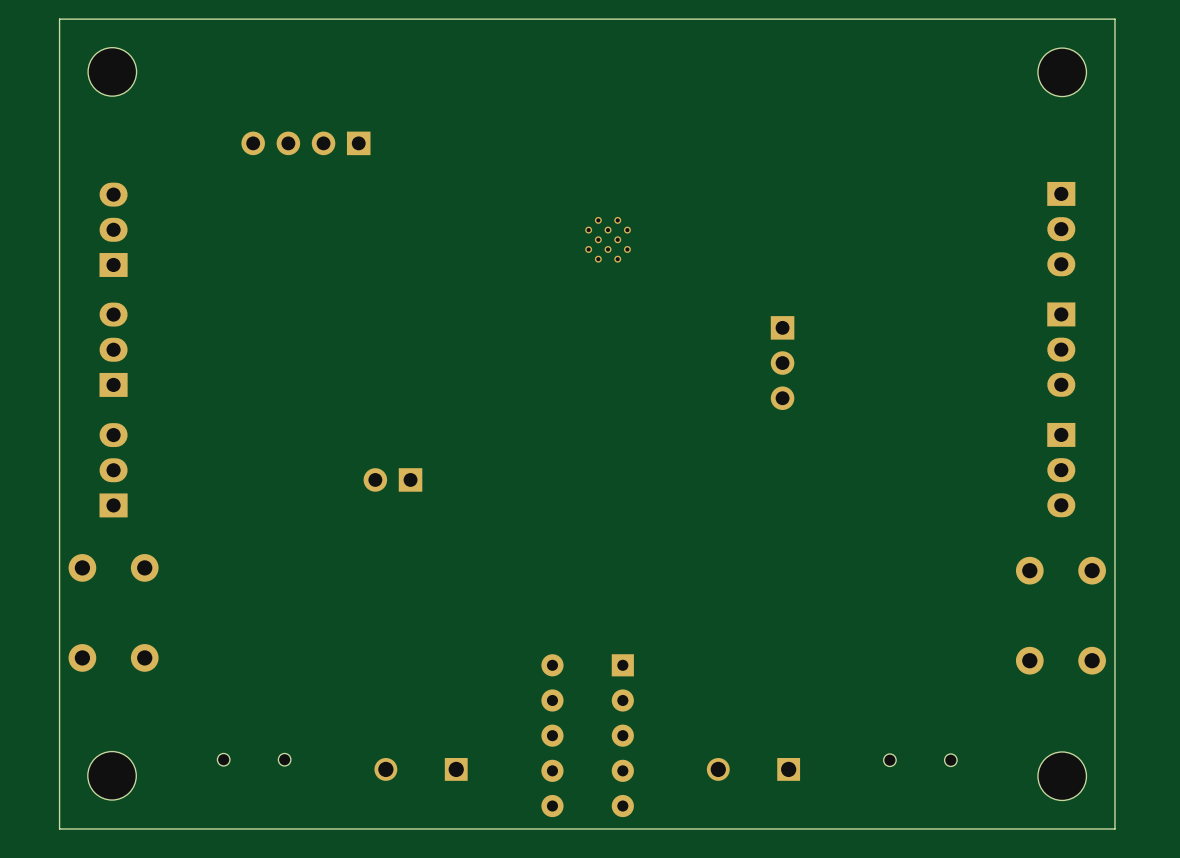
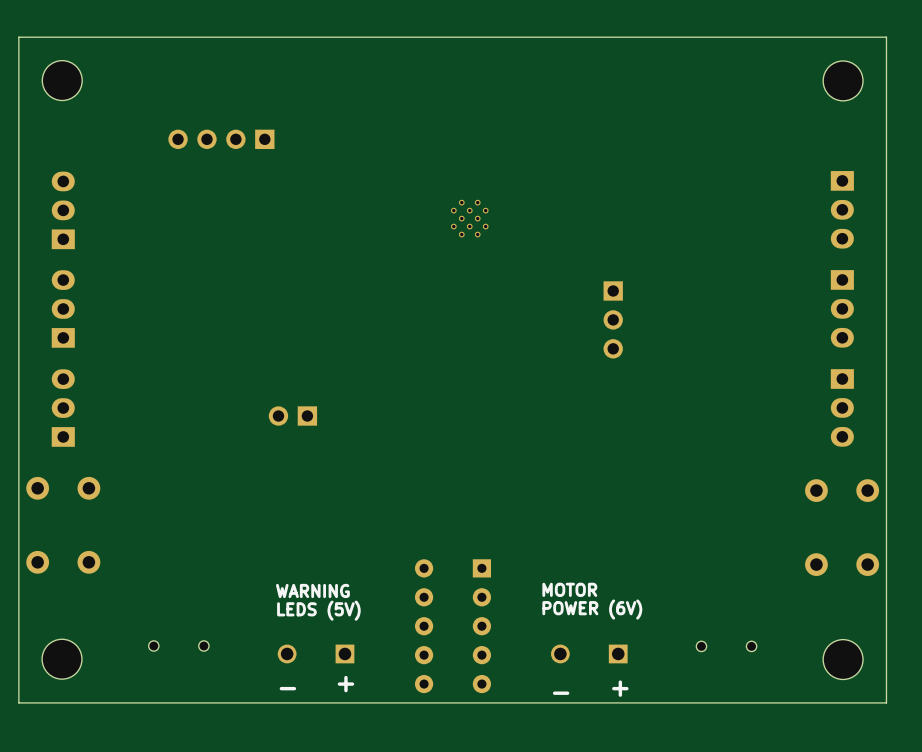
text: none -> MOTOR (569, 589)
text: none -> WARNING (312, 590)
text: none -> POWER (6V) (592, 609)
text: none -> LEDS (5V) (318, 610)
text: none -> + (345, 684)
text: none -> - (287, 688)
text: none -> + (620, 688)
text: none -> - (561, 693)

